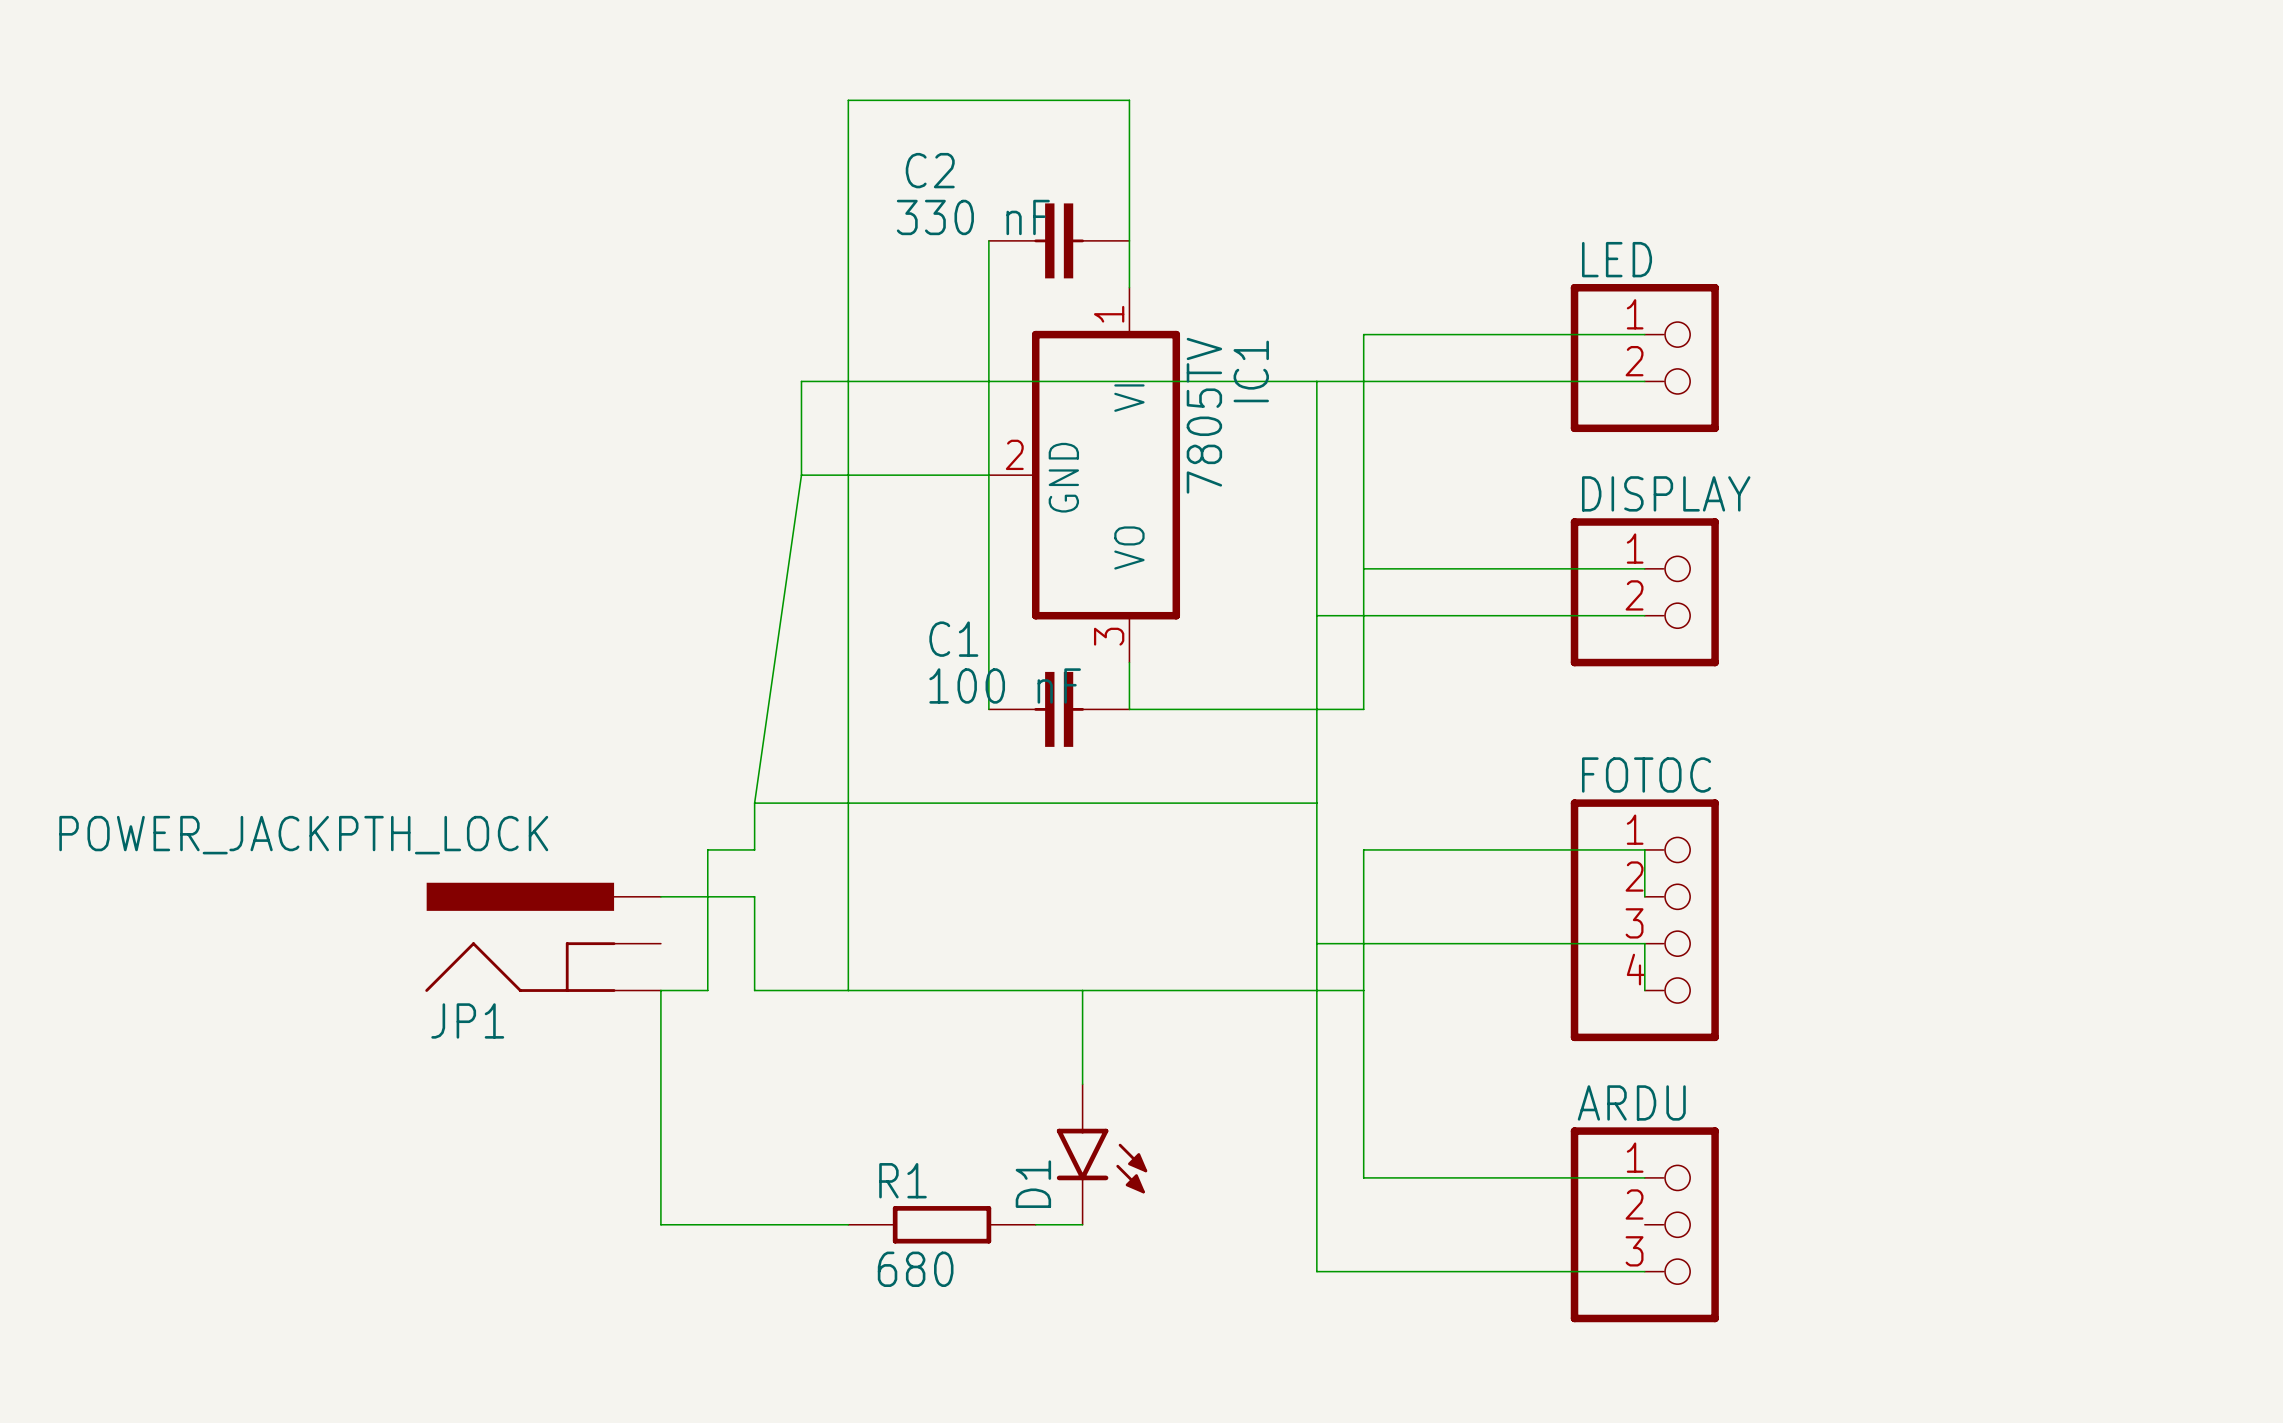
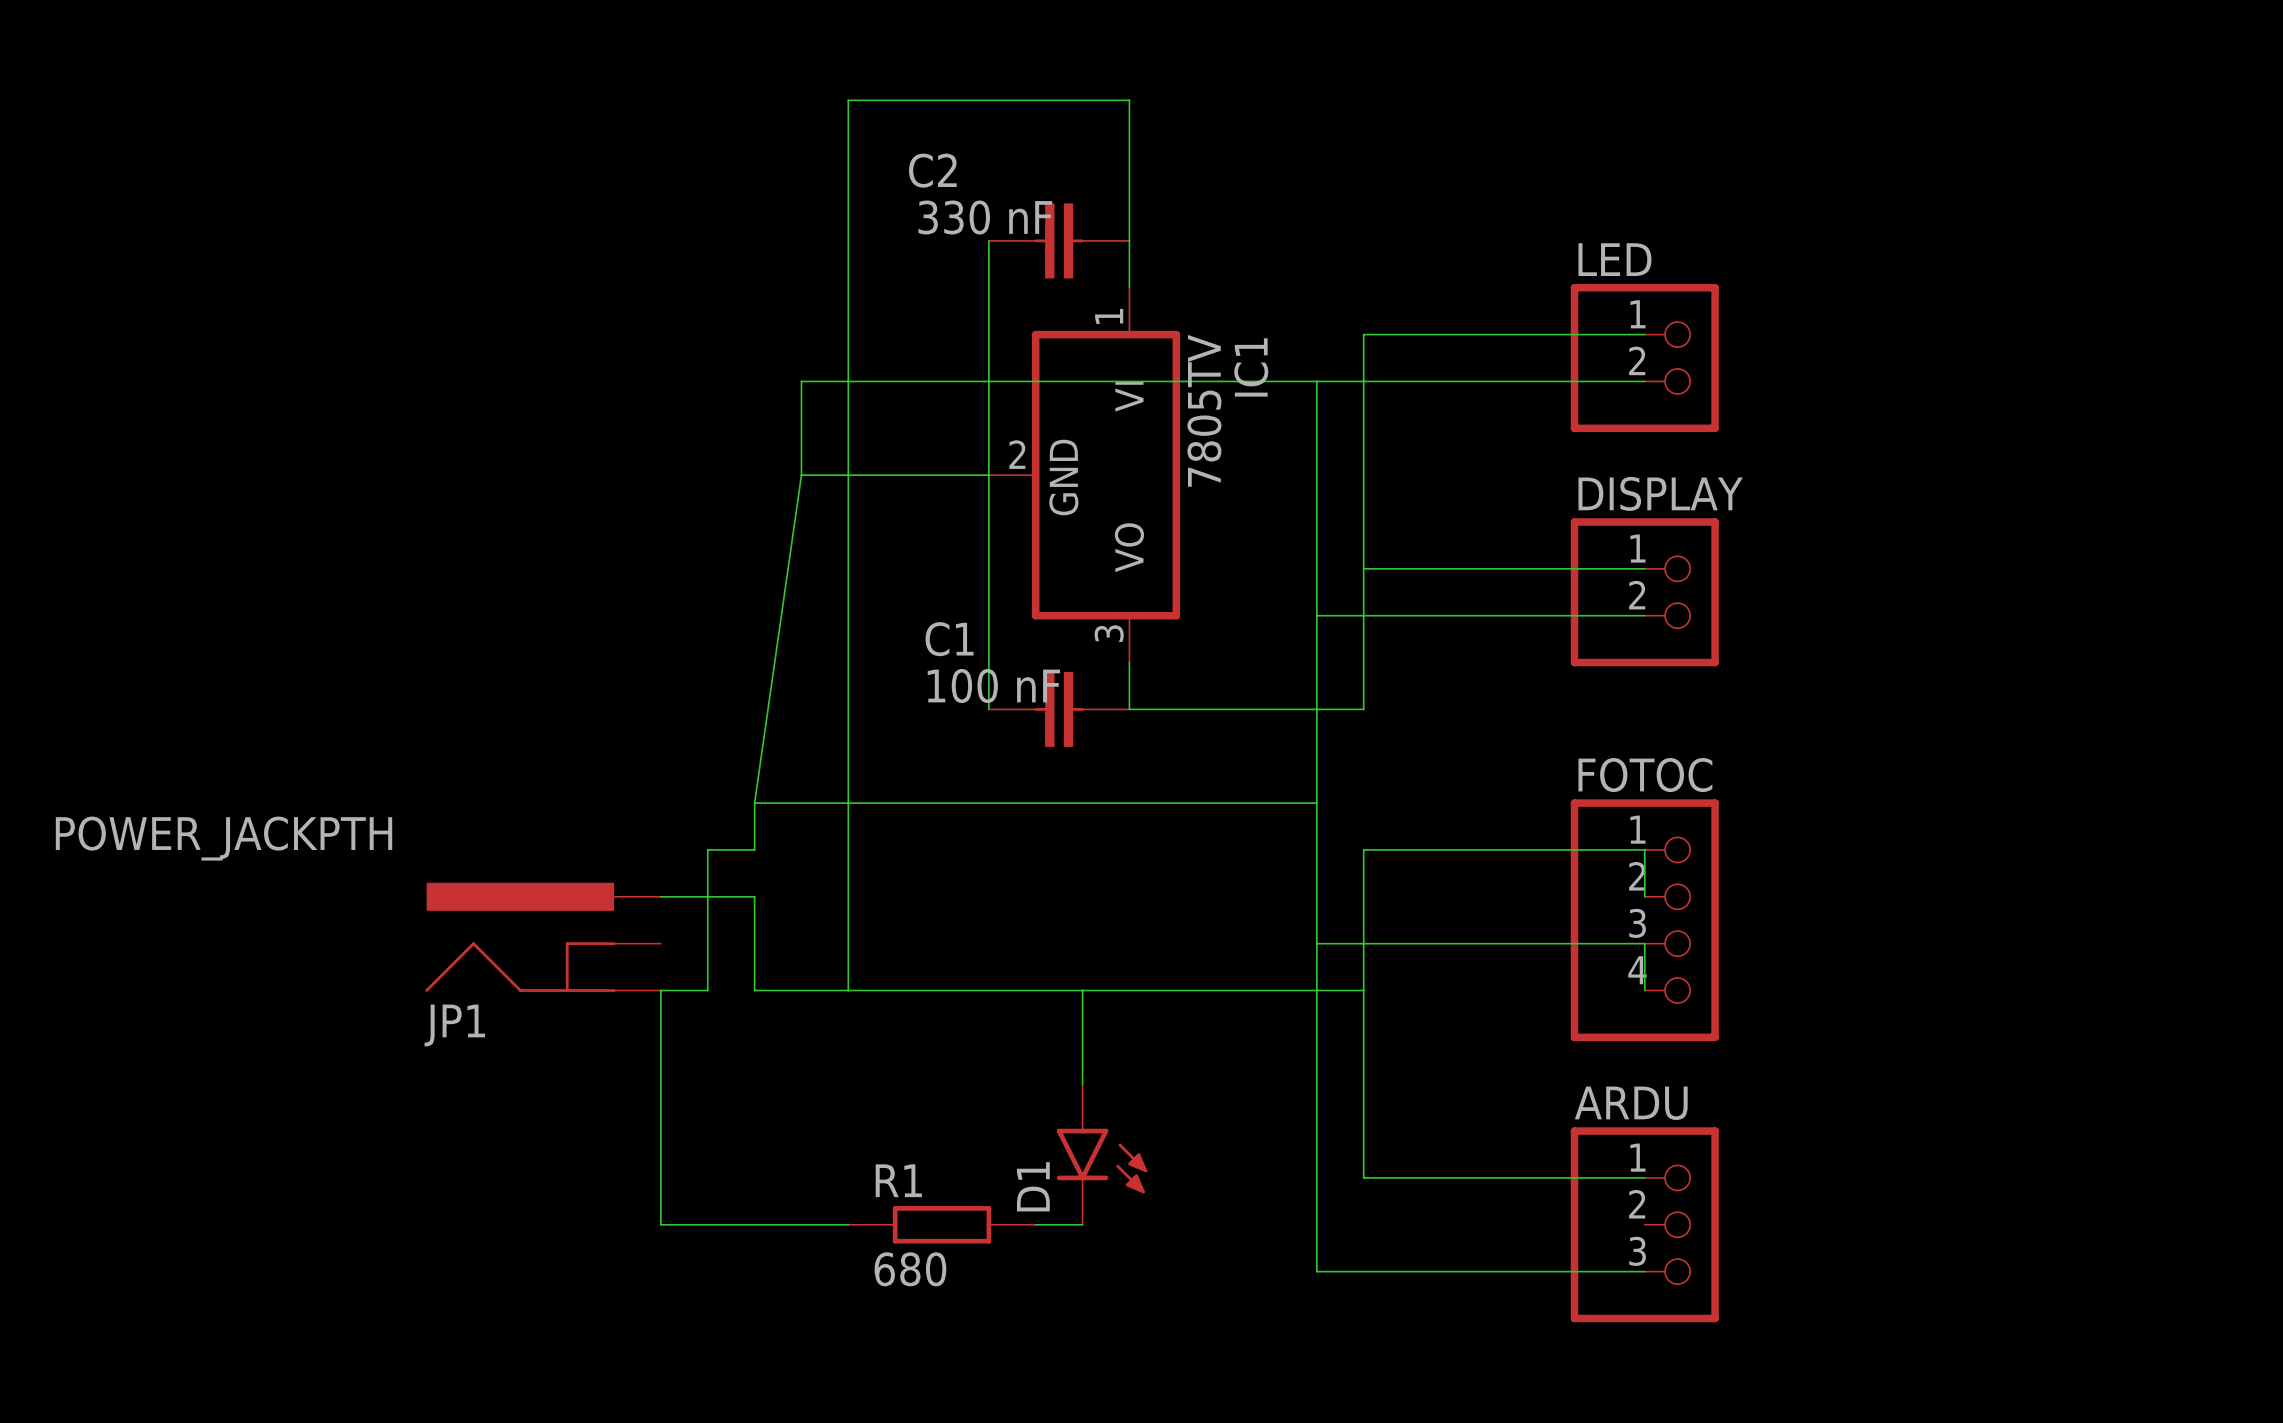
JP1 value: POWER_JACKPTH_LOCK (303, 835) -> POWER_JACKPTH (224, 838)

